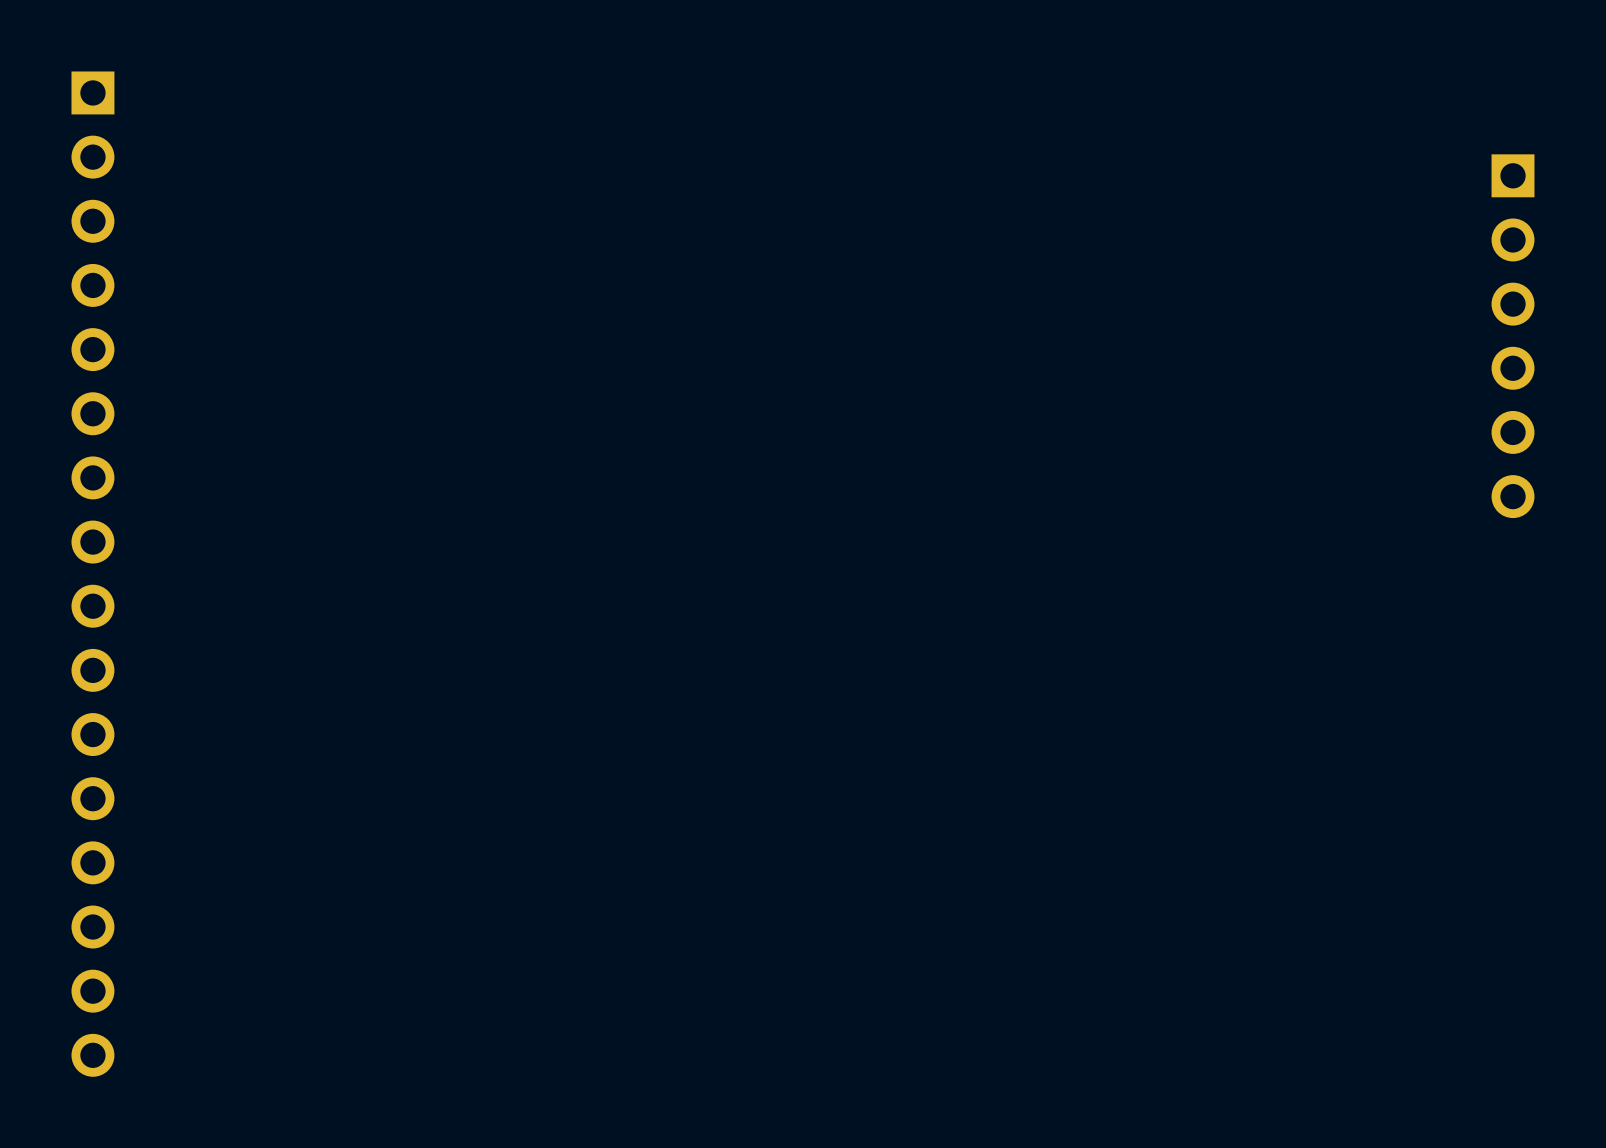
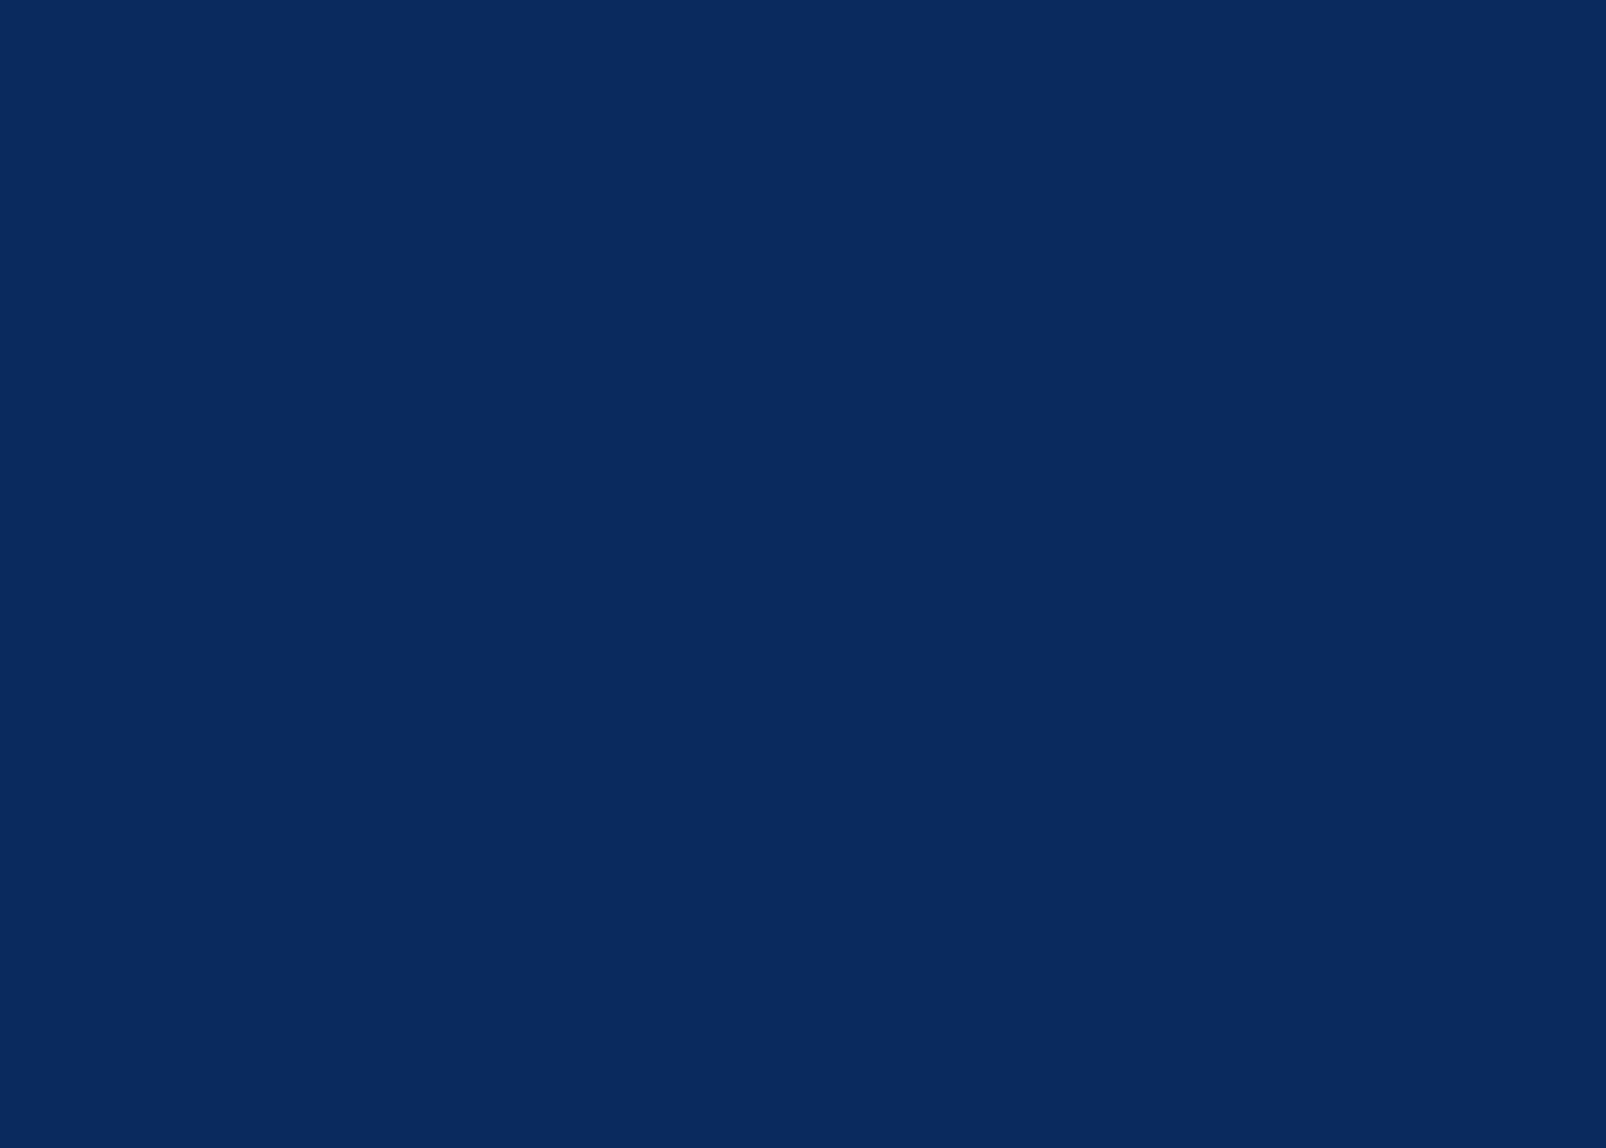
part: (1513, 336) -> none
part: (92, 574) -> none

